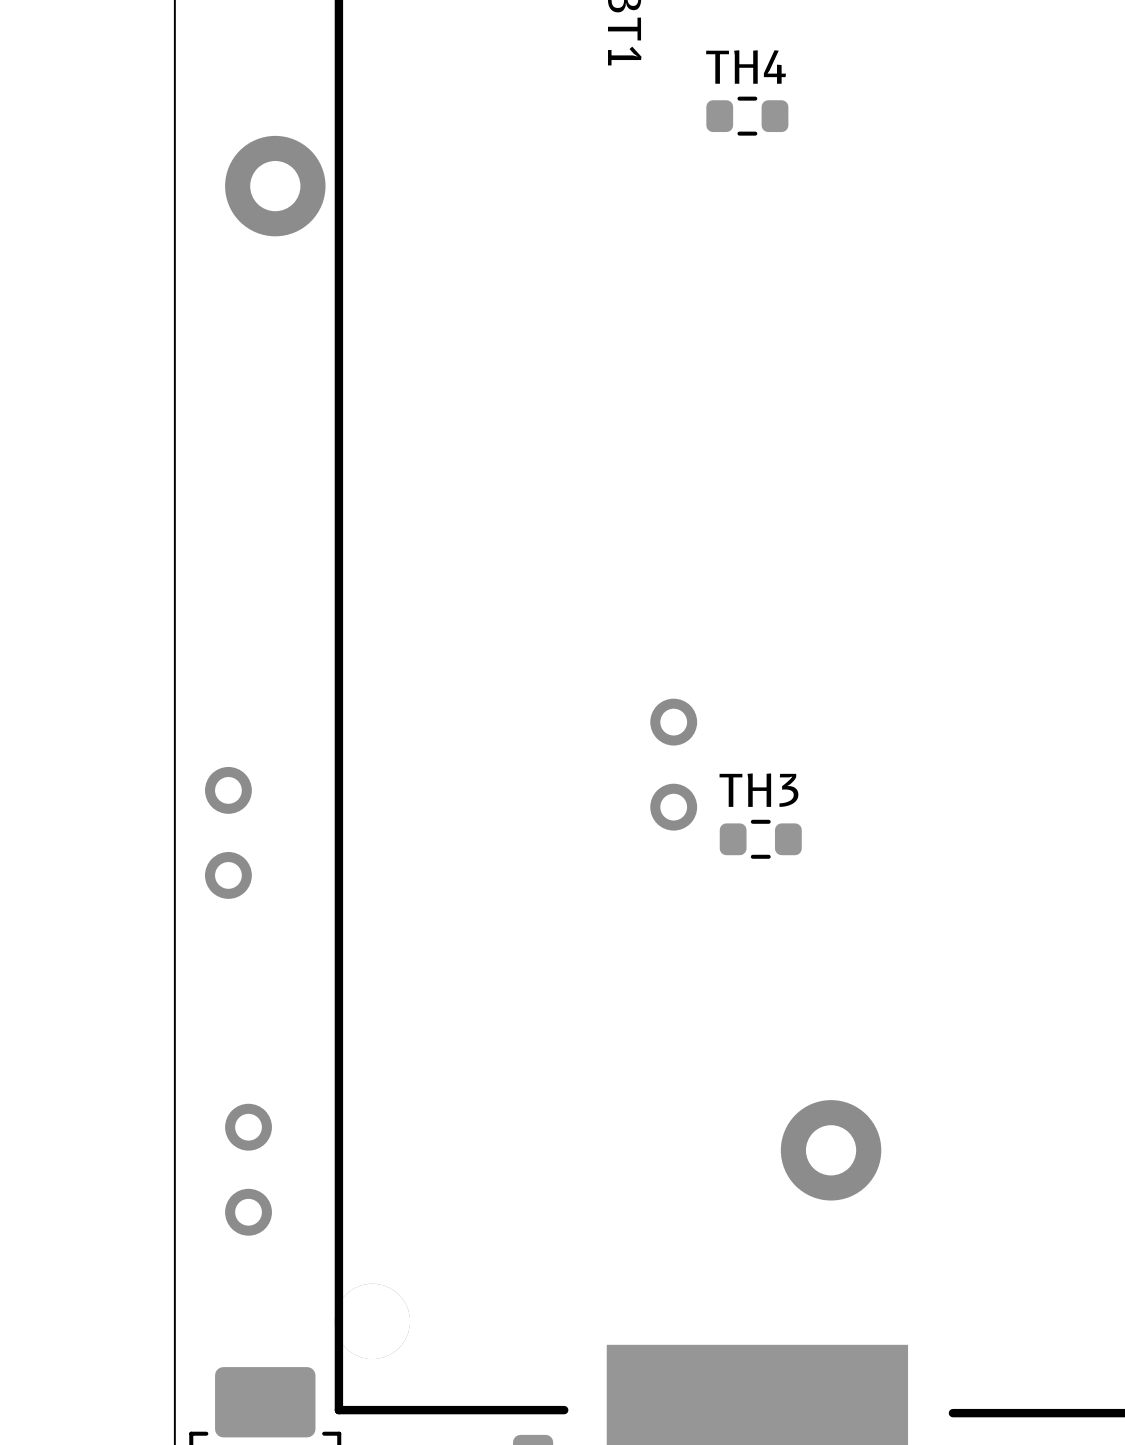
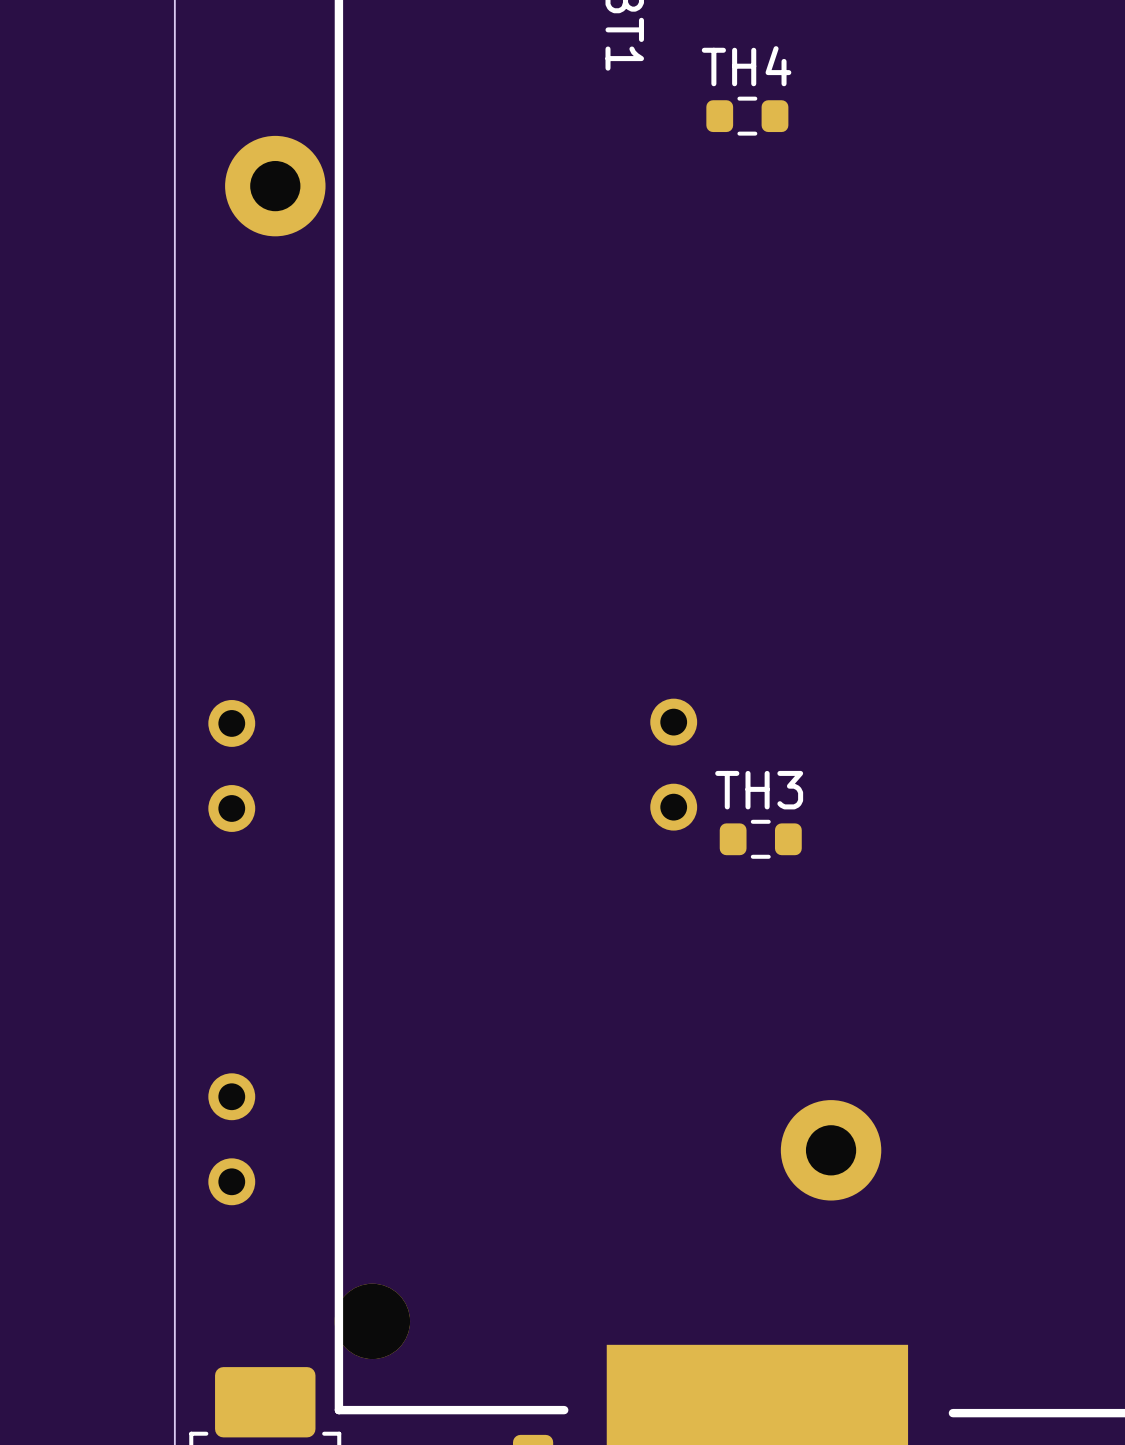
part position: (228, 832) -> (231, 765)
part position: (248, 1169) -> (231, 1139)

